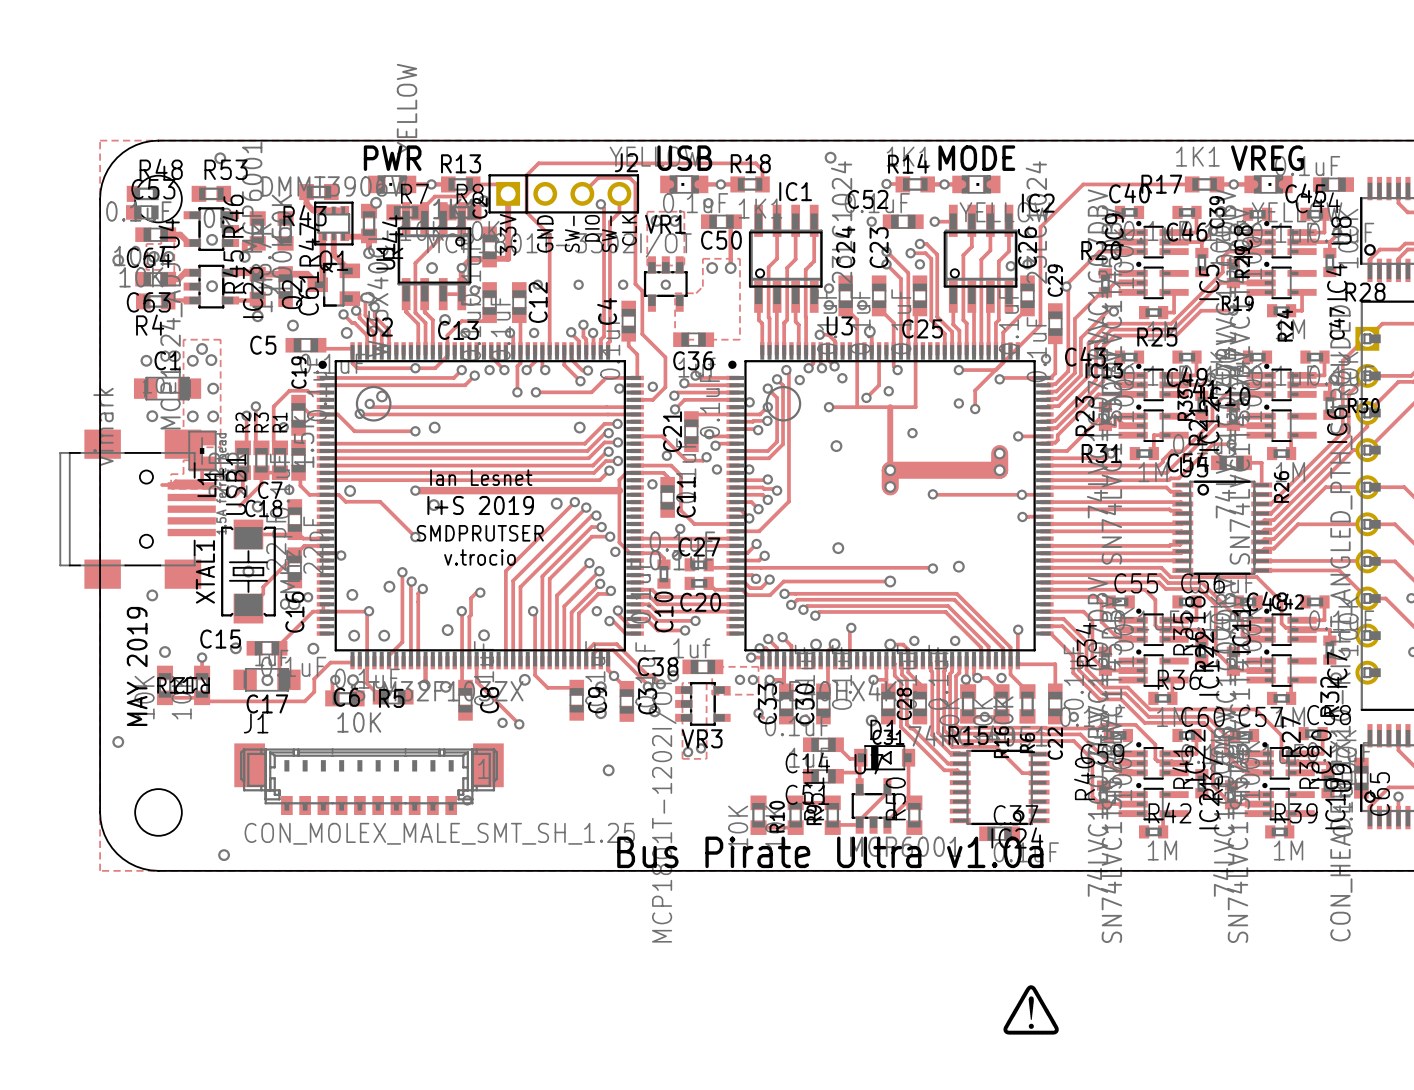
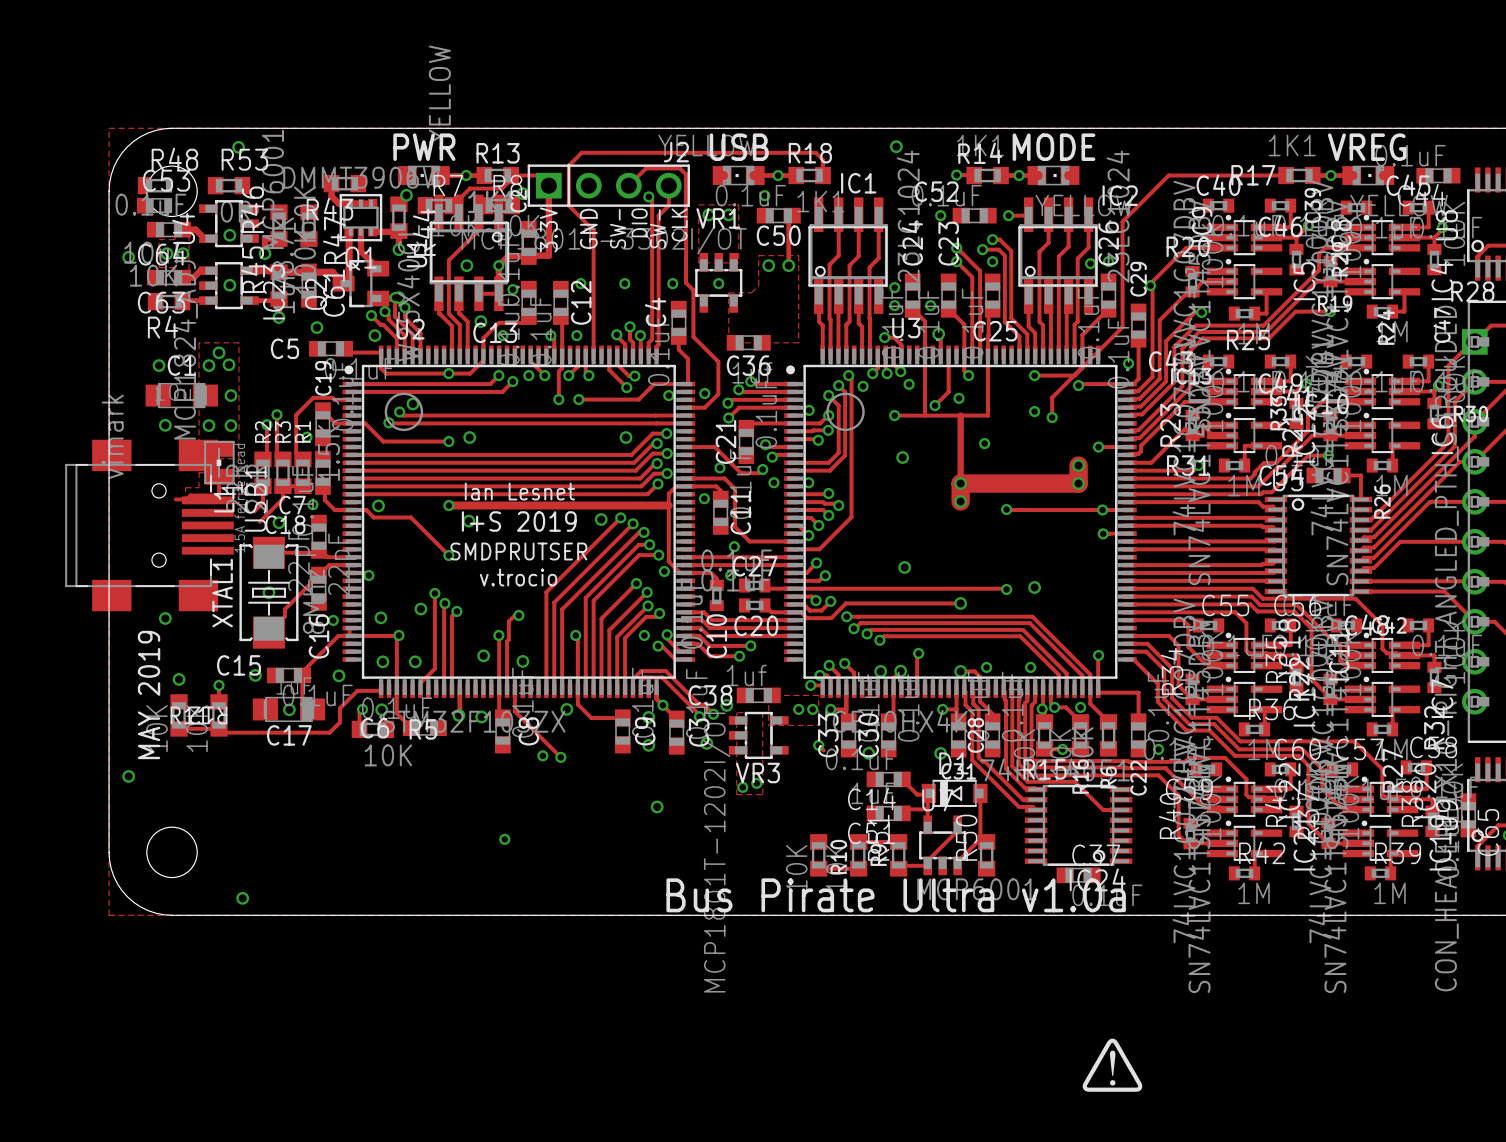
J1: CON_MOLEX_MALE_SMT_SH_1.25 (369, 779) -> none

